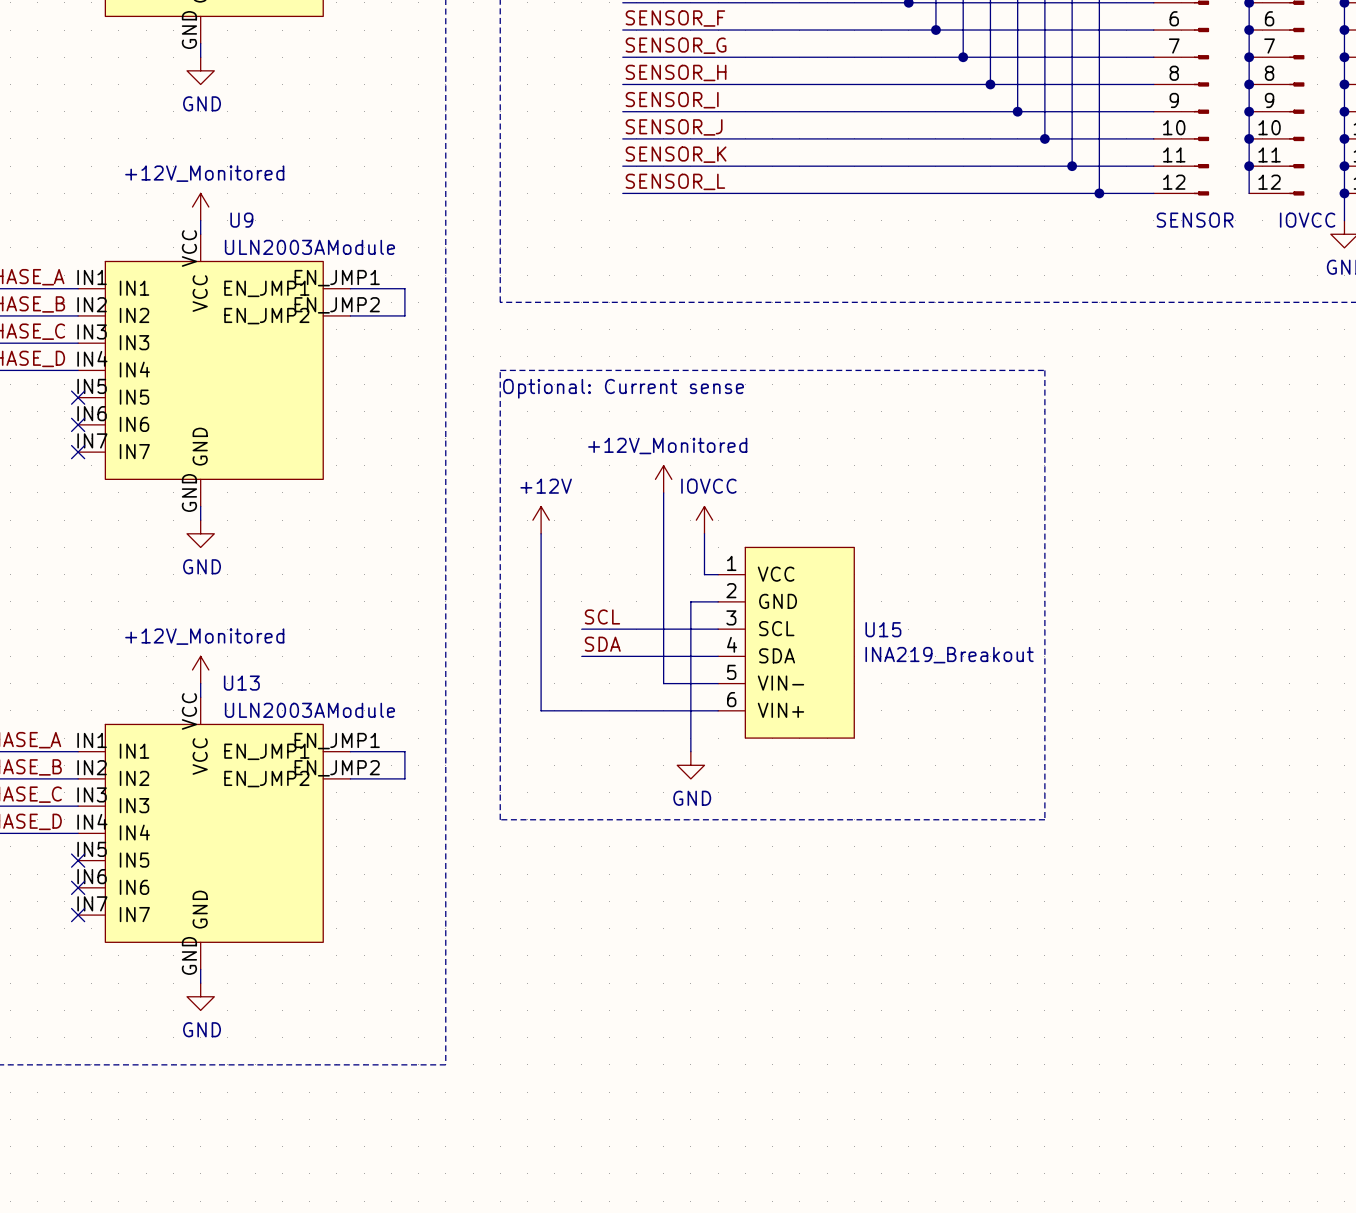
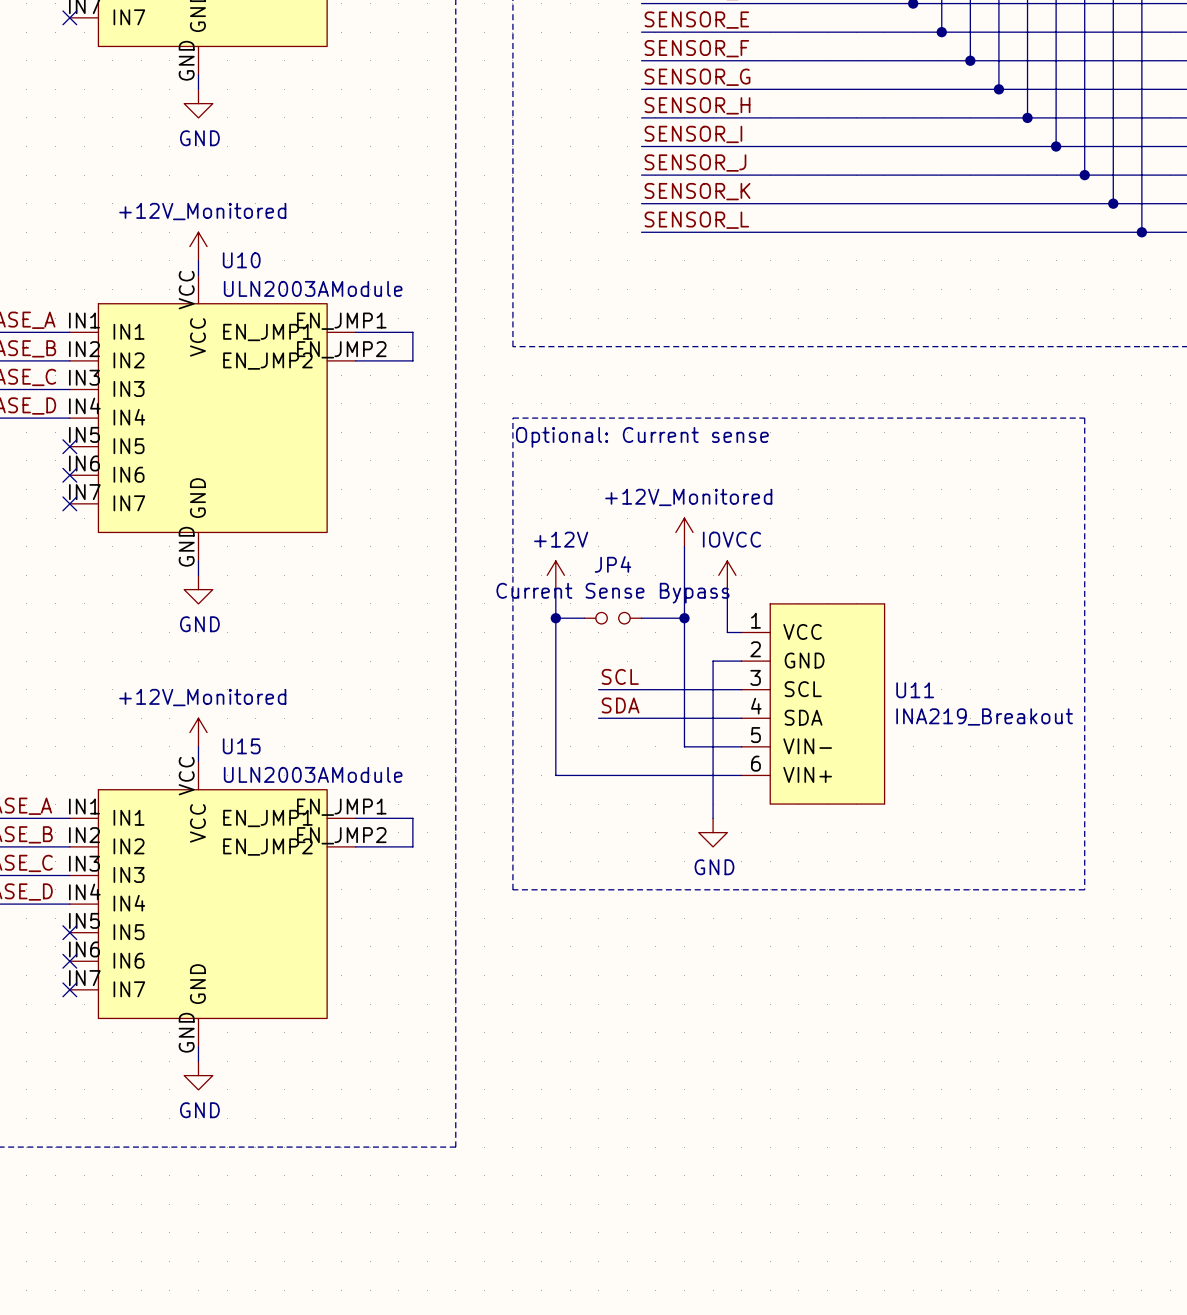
U9 name: U9 (241, 220) -> U10 (241, 260)
wire: none -> (555, 618) (584, 618)
junction: none -> (555, 618)
JP4: none -> Current Sense Bypass (613, 618)
wire: none -> (641, 618) (684, 618)
junction: none -> (684, 618)
U15 name: U15 (883, 629) -> U11 (915, 690)
U13 name: U13 (241, 683) -> U15 (241, 746)

